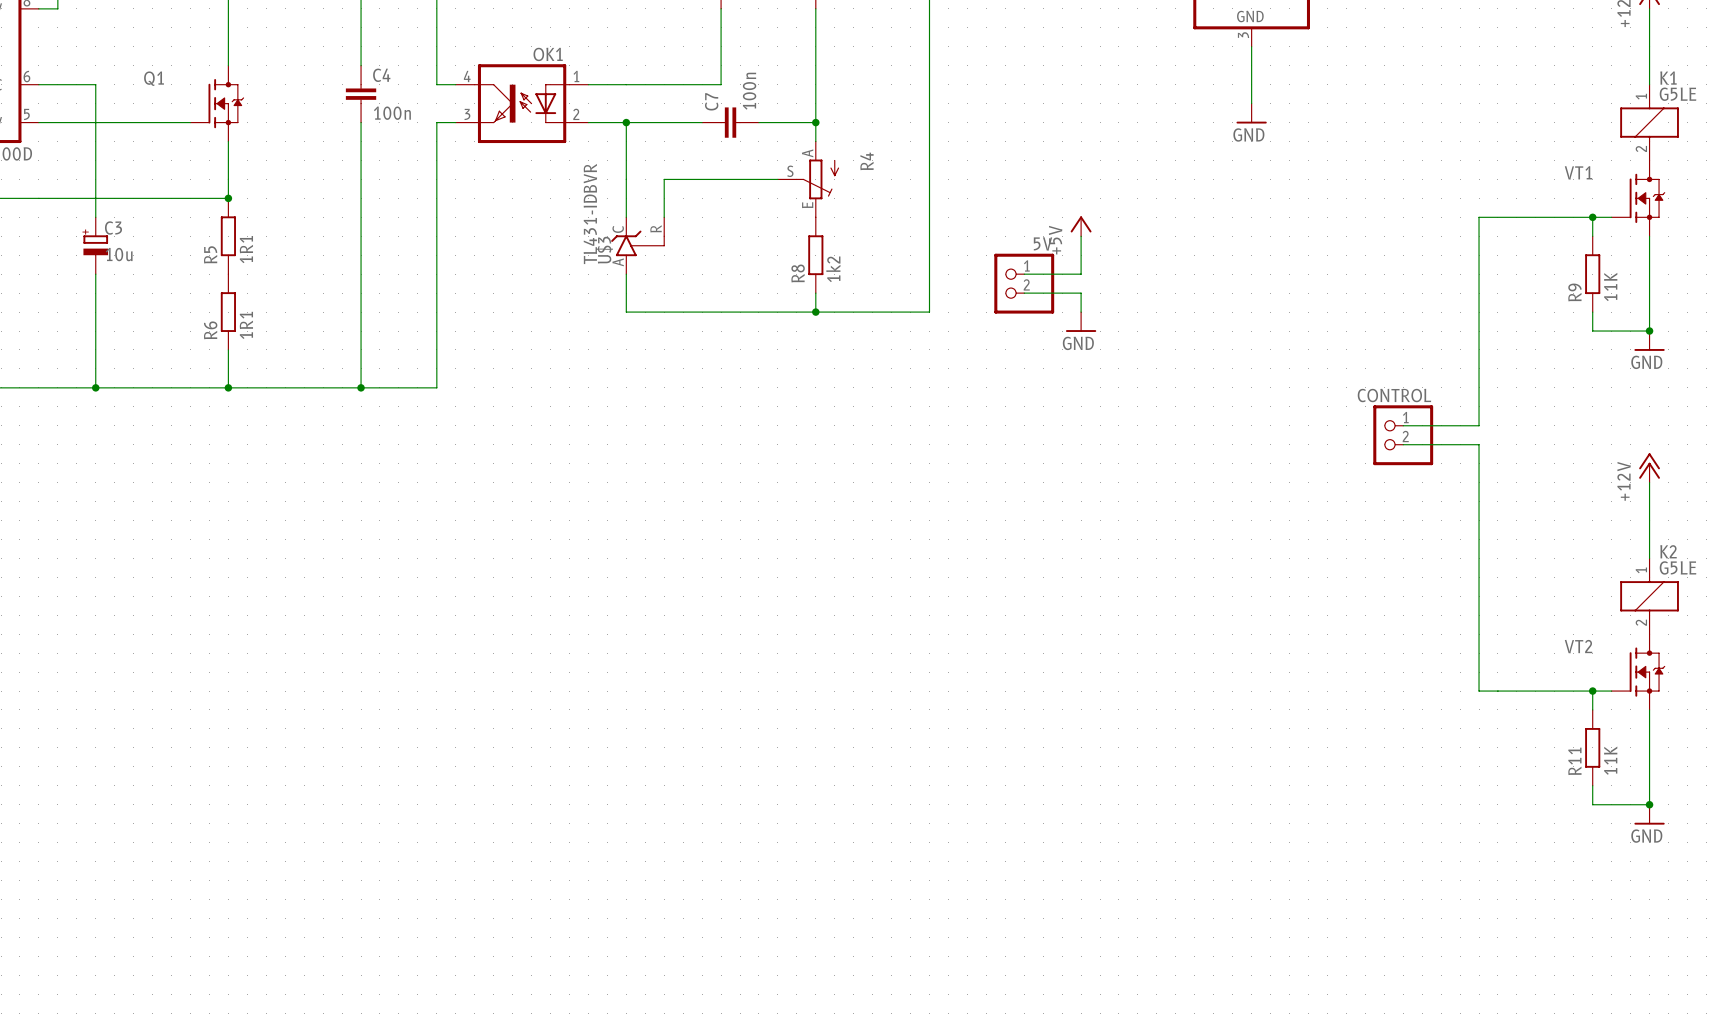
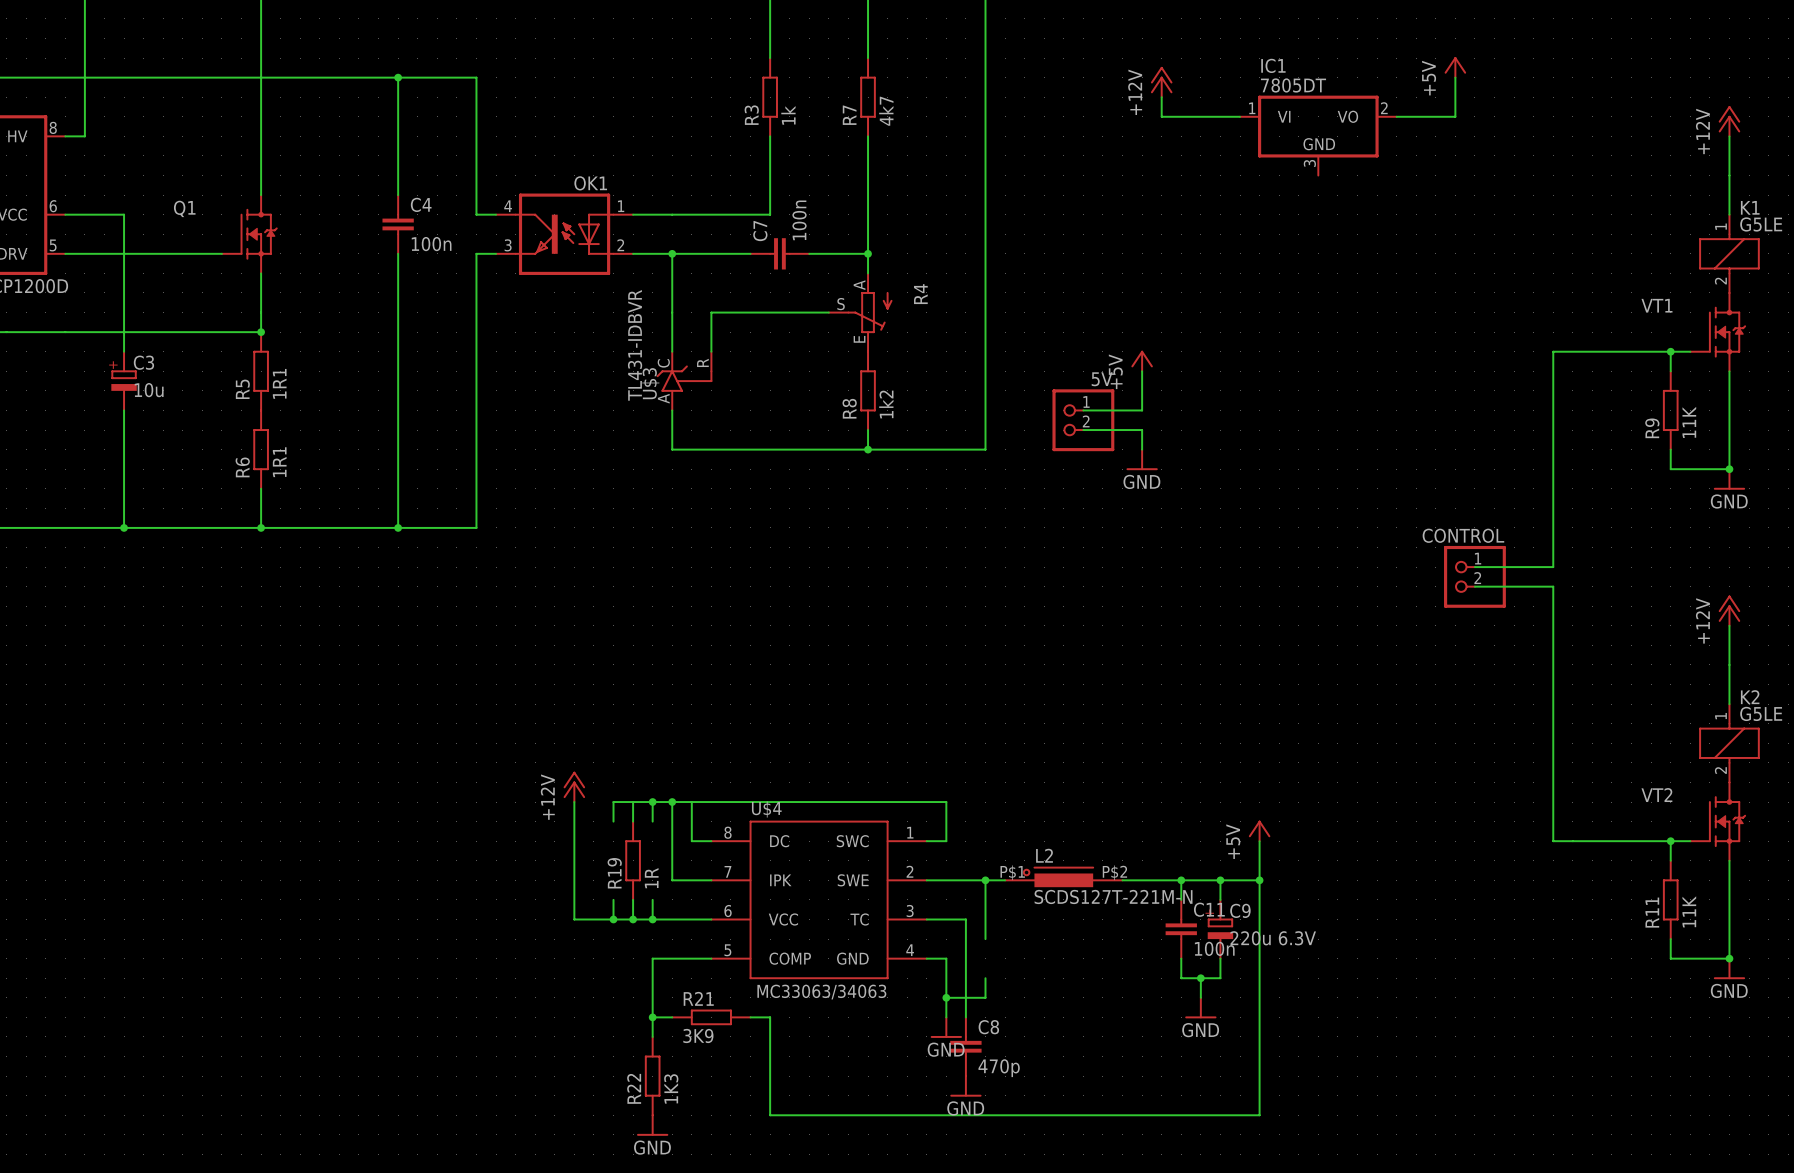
wire: (1251, 46) (1251, 103) -> none
power symbol: GND (1251, 113) -> none
power symbol: none -> +12V (574, 786)
wire: none -> (574, 802) (574, 919) (711, 919)
wire: none -> (633, 802) (633, 821)
wire: none -> (652, 802) (652, 821)
junction: none -> (652, 802)
wire: none -> (672, 802) (672, 880) (711, 880)
junction: none -> (672, 802)
wire: none -> (691, 802) (691, 841) (711, 841)
wire: none -> (613, 821) (613, 802) (946, 802) (946, 841) (926, 841)
power symbol: none -> +5V (1259, 830)
wire: none -> (1259, 841) (1259, 1115) (770, 1115) (770, 1017) (750, 1017)
R19: none -> 1R (633, 860)
L2: none -> SCDS127T-221M-N (1063, 876)
wire: none -> (926, 880) (1005, 880)
wire: none -> (985, 880) (985, 939)
junction: none -> (985, 880)
wire: none -> (1122, 880) (1259, 880)
wire: none -> (1181, 880) (1181, 899)
junction: none -> (1181, 880)
wire: none -> (1220, 880) (1220, 899)
junction: none -> (1220, 880)
junction: none -> (1259, 880)
wire: none -> (613, 899) (613, 919)
wire: none -> (633, 899) (633, 919)
wire: none -> (652, 899) (652, 919)
U$4: none -> (819, 899)
junction: none -> (613, 919)
junction: none -> (633, 919)
junction: none -> (652, 919)
wire: none -> (926, 919) (965, 919) (965, 1017)
C11: none -> 100n (1181, 929)
C9: none -> 220u 6.3V (1220, 929)
wire: none -> (711, 958) (652, 958) (652, 1036)
wire: none -> (926, 958) (946, 958) (946, 1017)
wire: none -> (1181, 958) (1181, 978) (1220, 978) (1220, 958)
wire: none -> (985, 978) (985, 997) (946, 997)
wire: none -> (1200, 978) (1200, 997)
junction: none -> (1200, 978)
junction: none -> (946, 997)
power symbol: none -> GND (1200, 1008)
wire: none -> (652, 1017) (672, 1017)
junction: none -> (652, 1017)
R21: none -> 3K9 (711, 1017)
power symbol: none -> GND (946, 1027)
C8: none -> 470p (965, 1046)
R22: none -> 1K3 (652, 1076)
power symbol: none -> GND (965, 1086)
power symbol: none -> GND (652, 1125)

